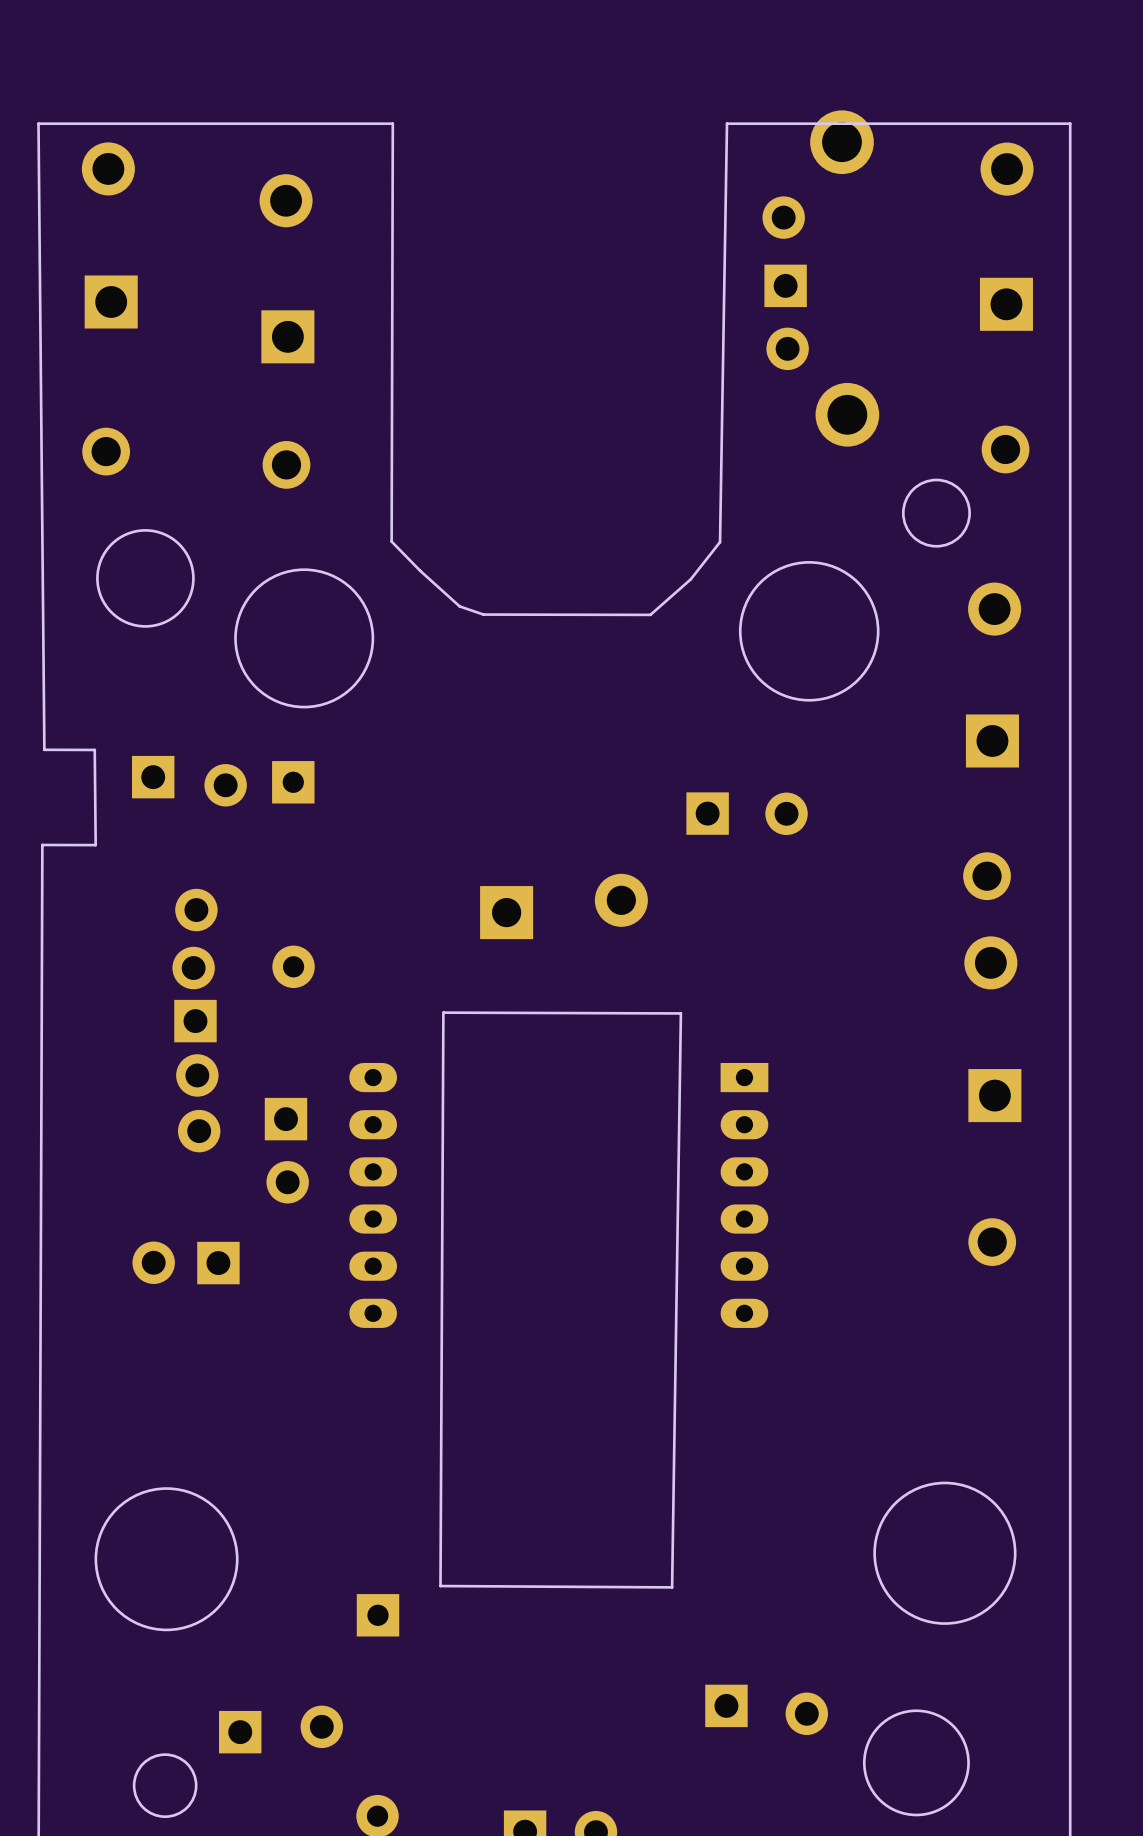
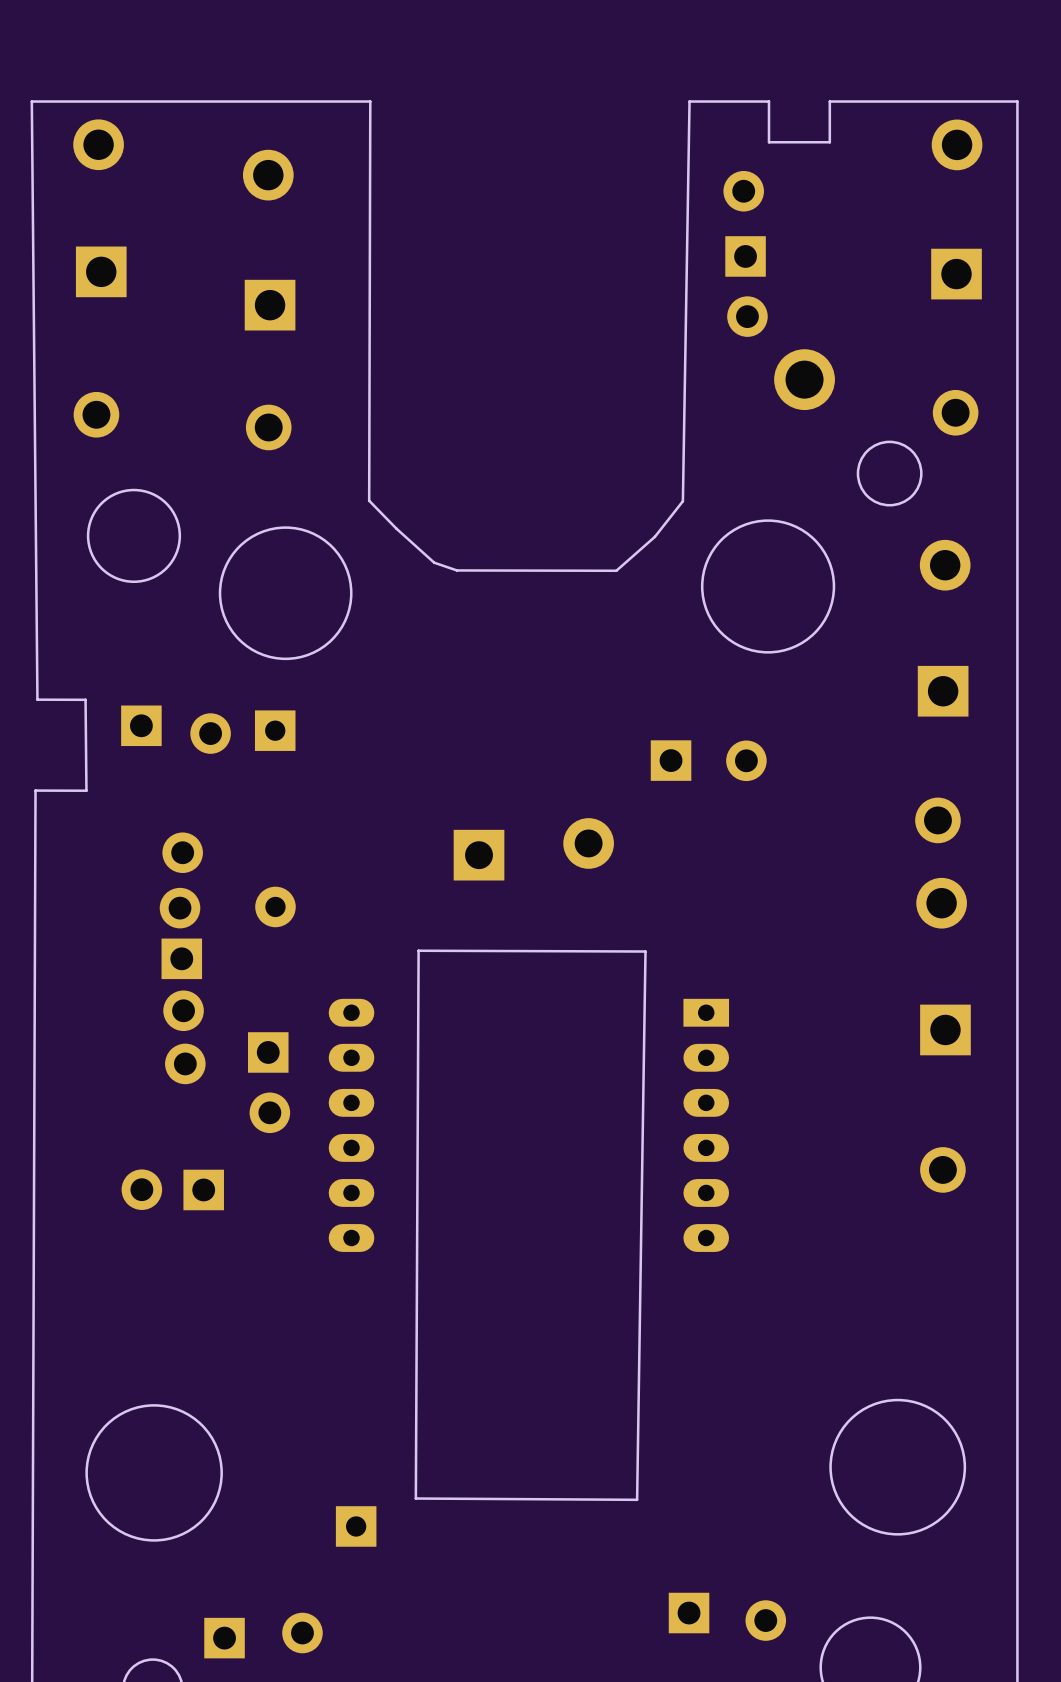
board edge: (873, 123) (810, 123) -> (829, 101) (829, 142) (768, 142) (768, 101)
part: (820, 278) -> none

